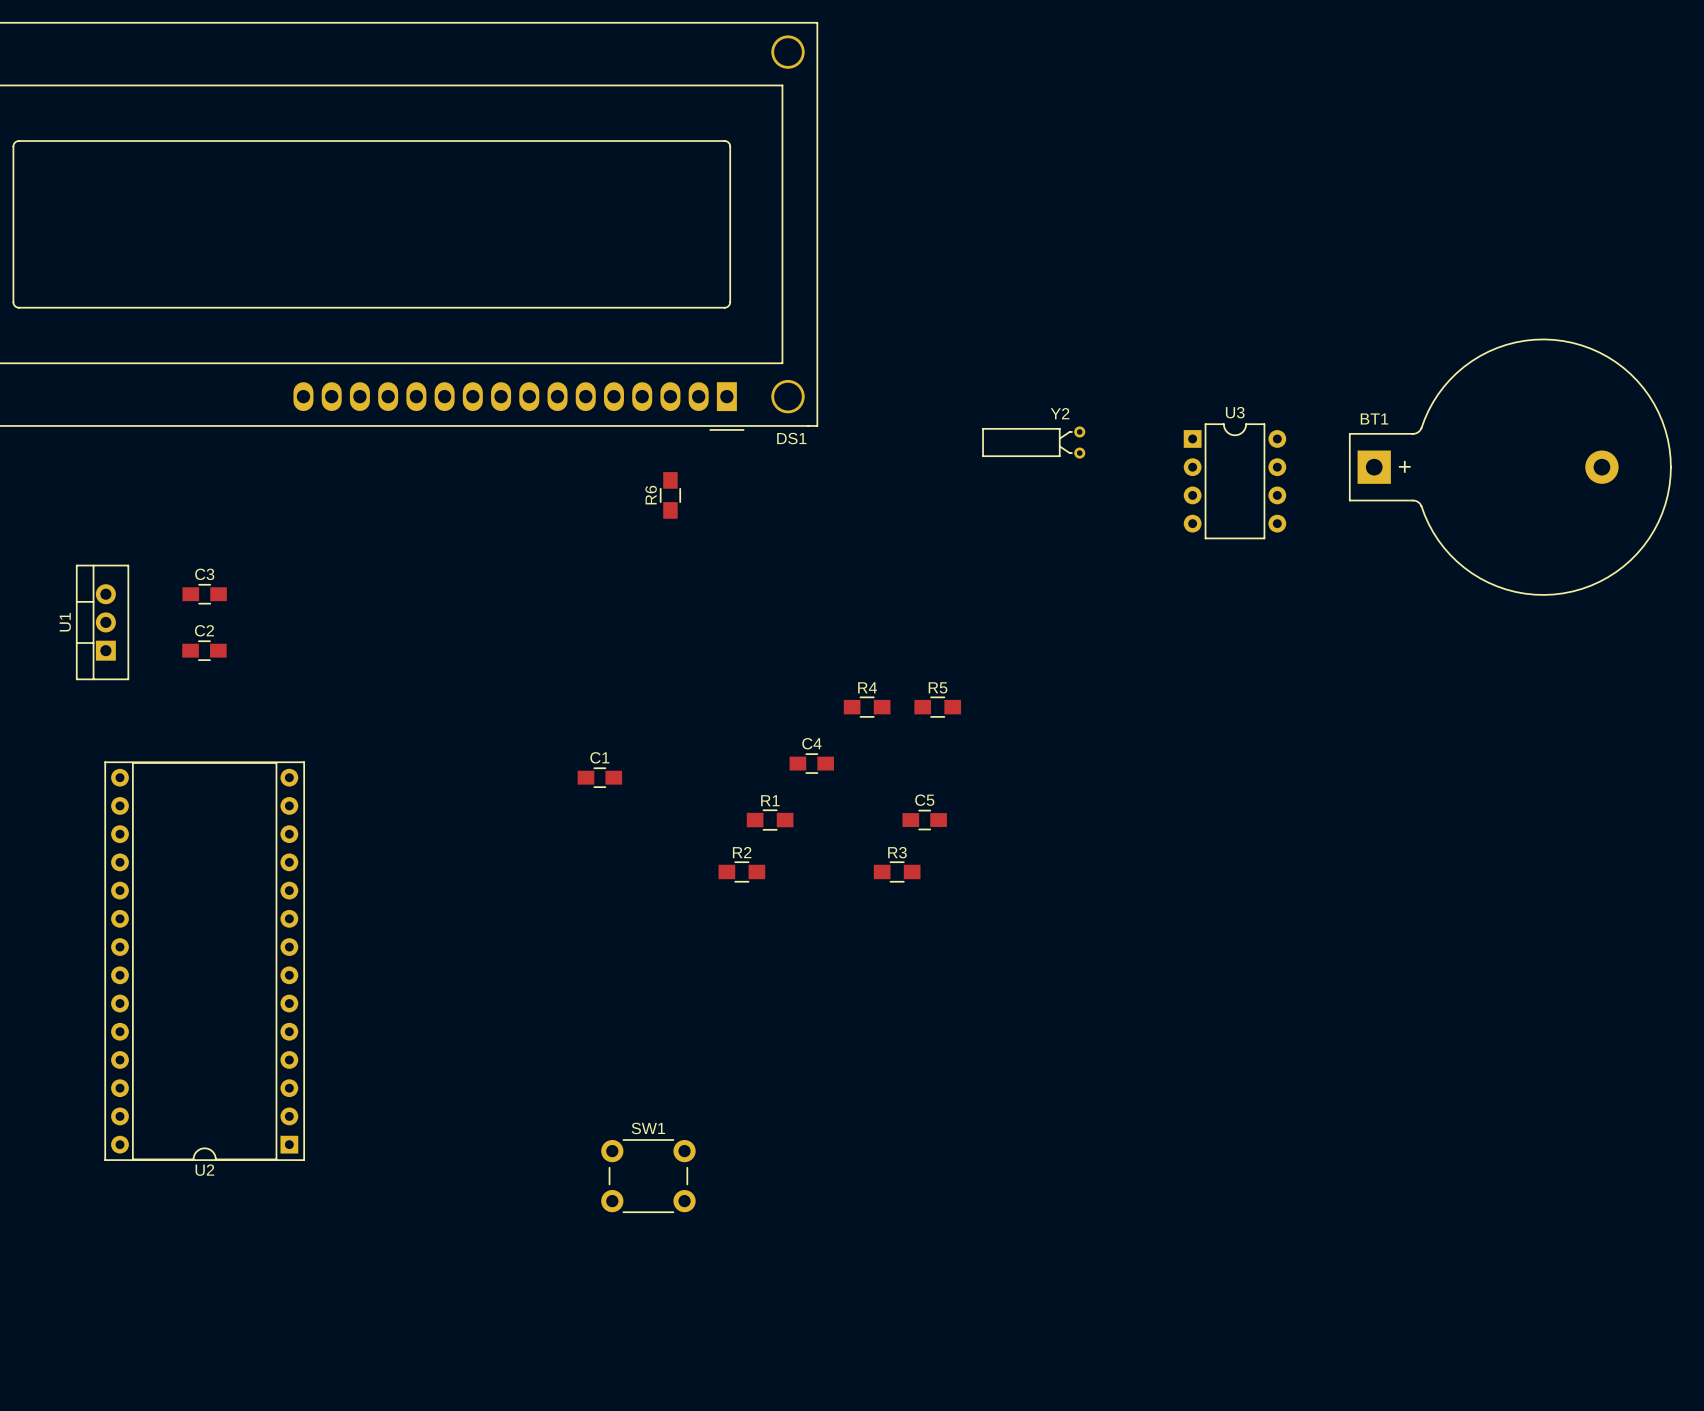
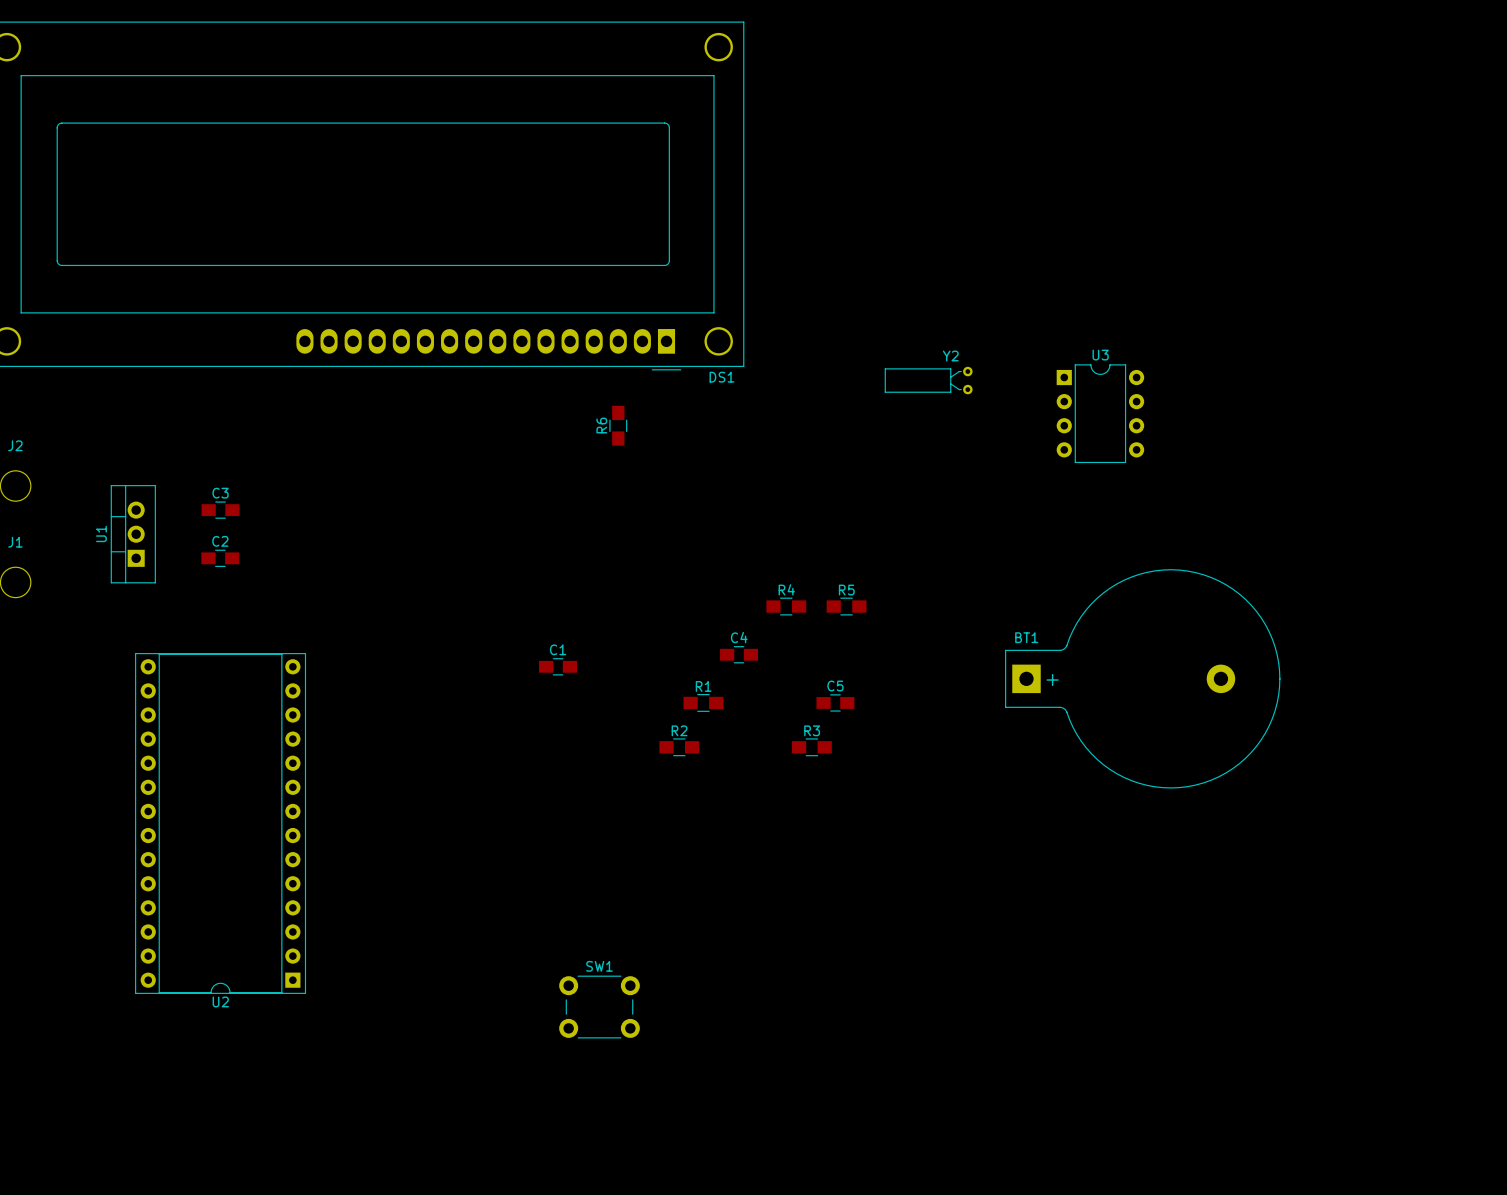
BT1 position: (1510, 467) -> (1142, 678)

